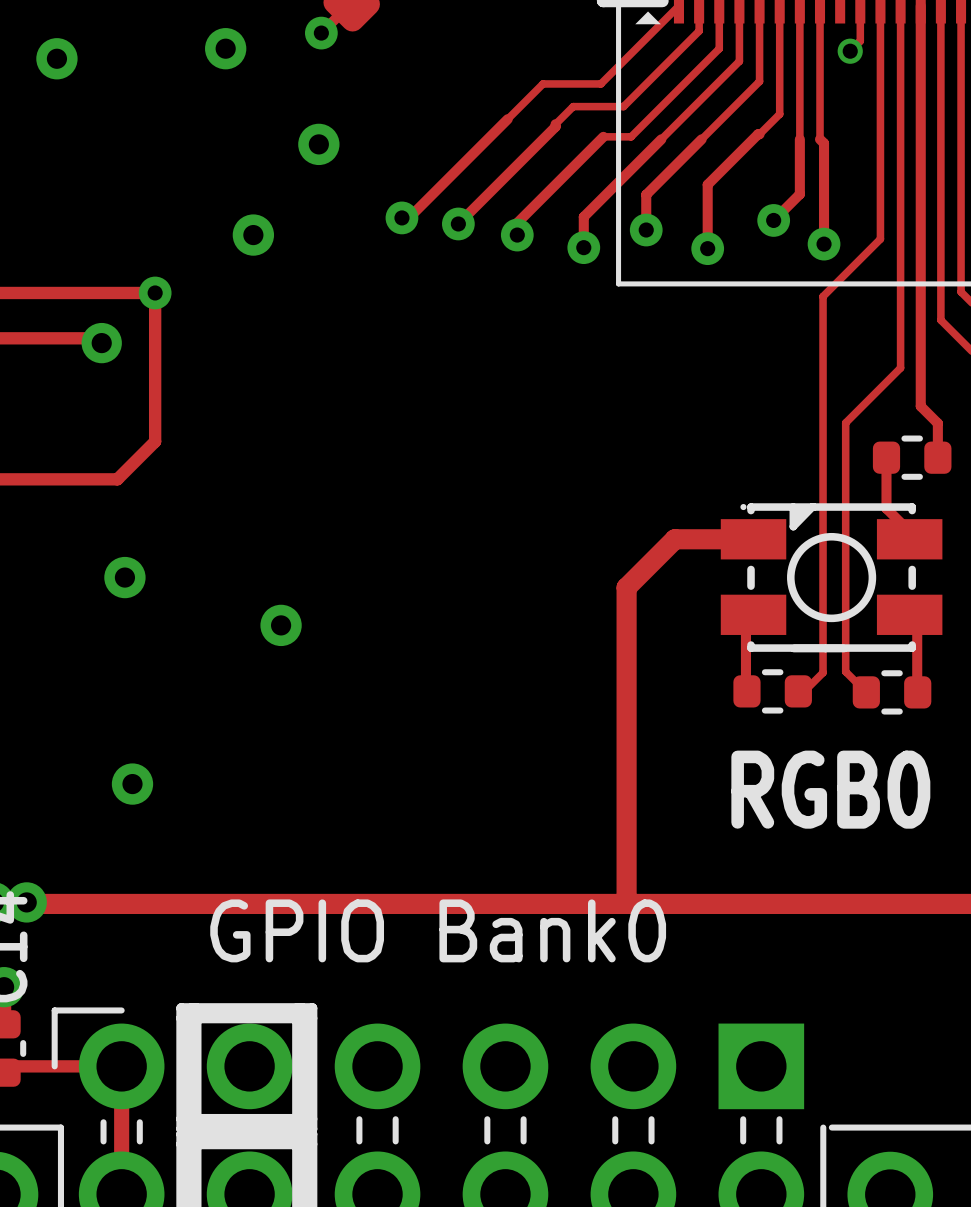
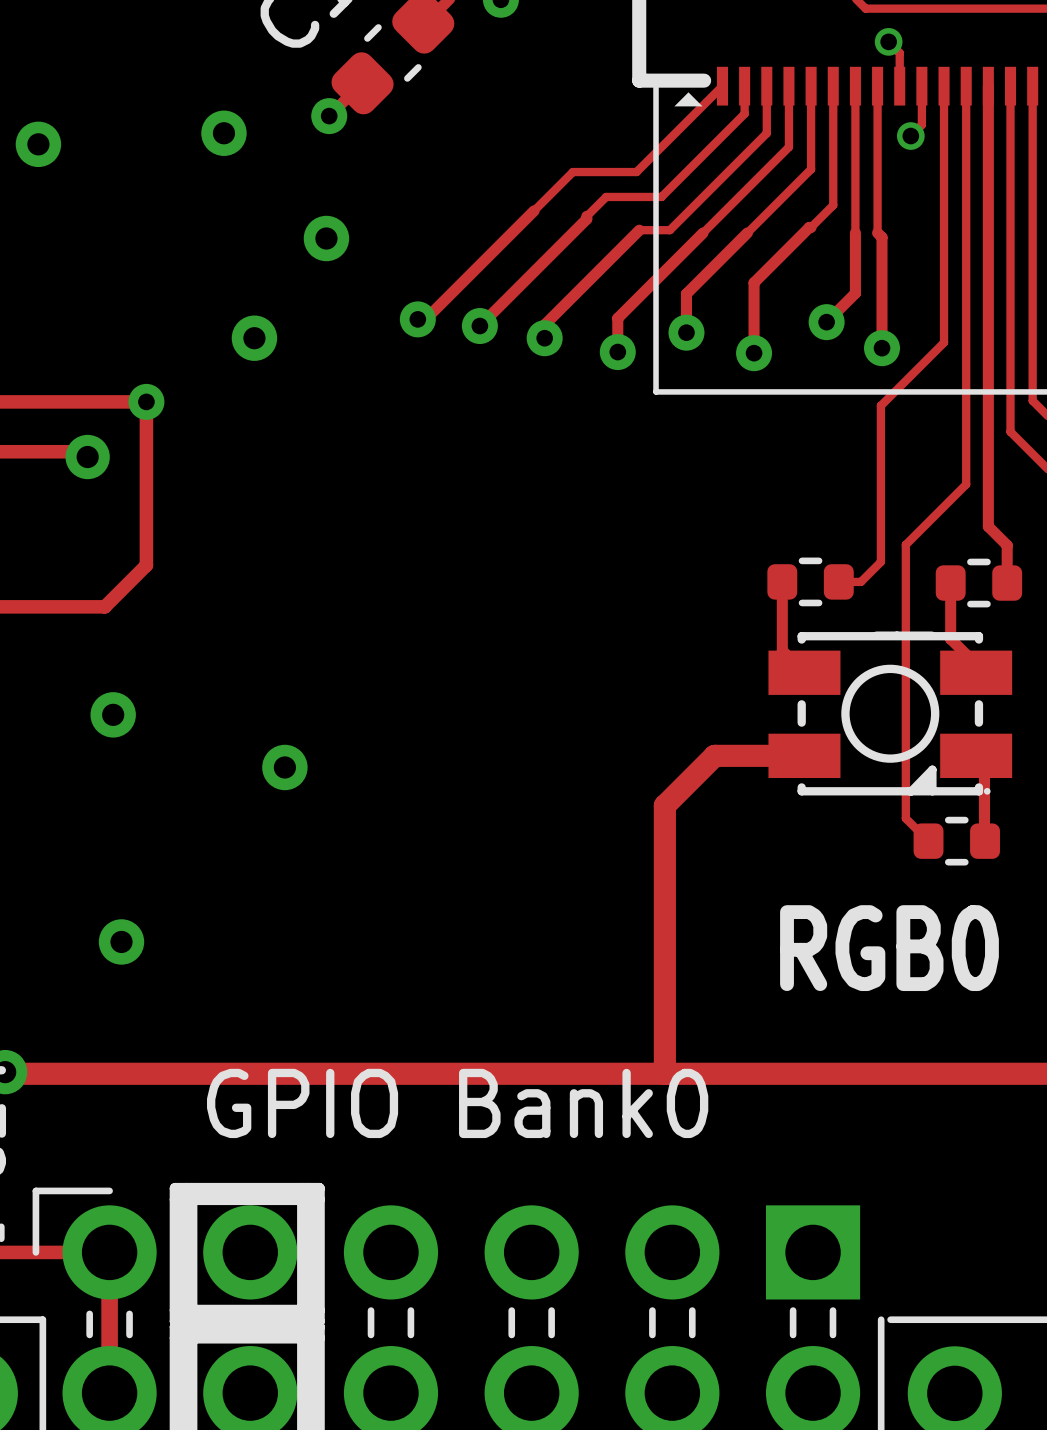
track: (823, 438) (823, 672) (804, 691) (798, 691) -> (880, 561) (860, 581) (838, 581)
track: none -> (782, 581) (782, 650) (804, 672)
track: (745, 539) (674, 539) (626, 587) (626, 660) -> (804, 755) (714, 755) (664, 805)
part rotation: 0° (831, 577) -> 180° (890, 713)
track: (745, 614) (746, 691) -> none
part position: (772, 691) -> (810, 581)

